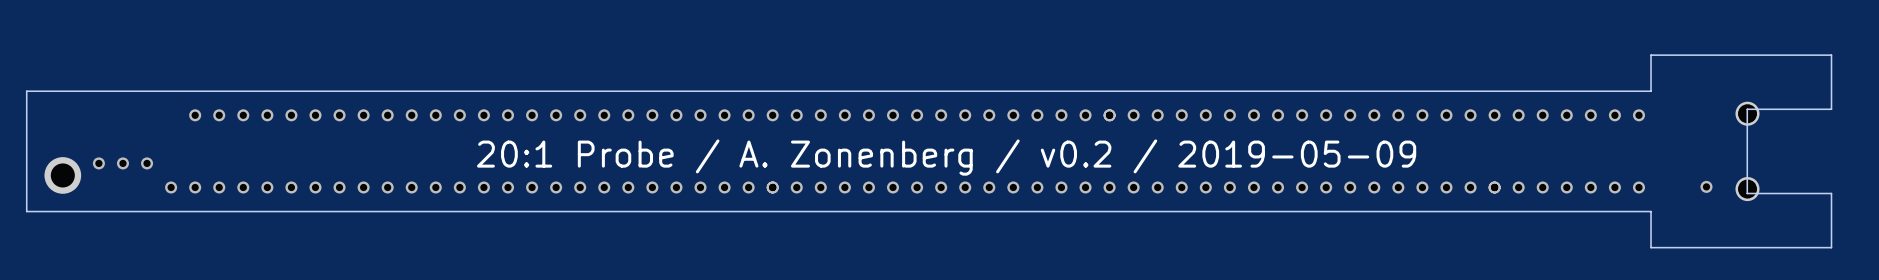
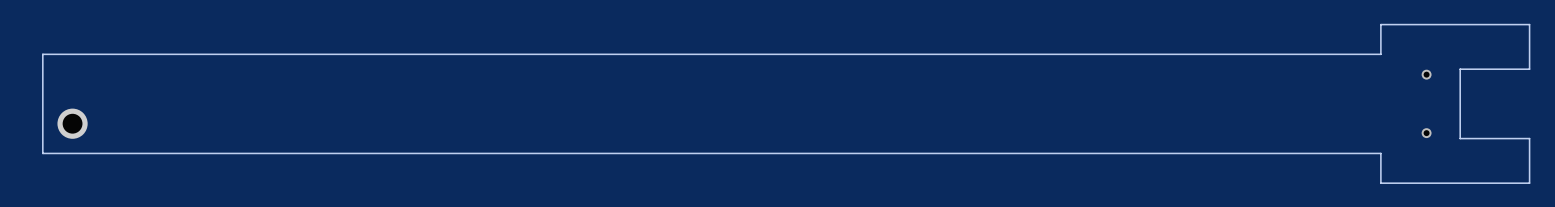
via: (195, 115) -> none
via: (219, 115) -> none
via: (243, 115) -> none
via: (267, 115) -> none
via: (291, 115) -> none
via: (315, 115) -> none
via: (339, 115) -> none
via: (363, 115) -> none
via: (387, 115) -> none
via: (411, 115) -> none
via: (435, 115) -> none
via: (459, 115) -> none
via: (483, 115) -> none
via: (507, 115) -> none
via: (532, 115) -> none
via: (556, 115) -> none
via: (580, 115) -> none
via: (604, 115) -> none
via: (628, 115) -> none
via: (652, 115) -> none
via: (676, 115) -> none
via: (700, 115) -> none
via: (724, 115) -> none
via: (748, 115) -> none
via: (772, 115) -> none
via: (796, 115) -> none
via: (820, 115) -> none
via: (844, 115) -> none
via: (868, 115) -> none
via: (893, 115) -> none
via: (917, 115) -> none
via: (941, 115) -> none
via: (965, 115) -> none
via: (989, 115) -> none
via: (1013, 115) -> none
via: (1037, 115) -> none
via: (1061, 115) -> none
via: (1085, 115) -> none
via: (1109, 115) -> none
via: (1133, 115) -> none
via: (1157, 115) -> none
via: (1181, 115) -> none
via: (1205, 115) -> none
via: (1229, 115) -> none
via: (1253, 115) -> none
via: (1278, 115) -> none
via: (1302, 115) -> none
via: (1326, 115) -> none
via: (1350, 115) -> none
via: (1374, 115) -> none
via: (1398, 115) -> none
via: (1422, 115) -> none
via: (1446, 115) -> none
via: (1470, 115) -> none
via: (1494, 115) -> none
via: (1518, 115) -> none
via: (1542, 115) -> none
via: (1566, 115) -> none
via: (1590, 115) -> none
via: (1614, 115) -> none
via: (1638, 115) -> none
via: none -> (1426, 74)
part: (1747, 151) -> none
text: 20:1 Probe / A. Zonenberg / v0.2 / 2019-05-09 (946, 157) -> none
via: (98, 163) -> none
via: (122, 163) -> none
via: (147, 163) -> none
via: (171, 187) -> none
via: (195, 187) -> none
via: (219, 187) -> none
via: (243, 187) -> none
via: (267, 187) -> none
via: (291, 187) -> none
via: (315, 187) -> none
via: (339, 187) -> none
via: (363, 187) -> none
via: (387, 187) -> none
via: (411, 187) -> none
via: (435, 187) -> none
via: (459, 187) -> none
via: (483, 187) -> none
via: (507, 187) -> none
via: (532, 187) -> none
via: (556, 187) -> none
via: (580, 187) -> none
via: (604, 187) -> none
via: (628, 187) -> none
via: (652, 187) -> none
via: (676, 187) -> none
via: (700, 187) -> none
via: (724, 187) -> none
via: (748, 187) -> none
via: (772, 187) -> none
via: (796, 187) -> none
via: (820, 187) -> none
via: (844, 187) -> none
via: (868, 187) -> none
via: (893, 187) -> none
via: (917, 187) -> none
via: (941, 187) -> none
via: (965, 187) -> none
via: (989, 187) -> none
via: (1013, 187) -> none
via: (1037, 187) -> none
via: (1061, 187) -> none
via: (1085, 187) -> none
via: (1109, 187) -> none
via: (1133, 187) -> none
via: (1157, 187) -> none
via: (1181, 187) -> none
via: (1205, 187) -> none
via: (1229, 187) -> none
via: (1253, 187) -> none
via: (1278, 187) -> none
via: (1302, 187) -> none
via: (1326, 187) -> none
via: (1350, 187) -> none
via: (1374, 187) -> none
via: (1398, 187) -> none
via: (1422, 187) -> none
via: (1446, 187) -> none
via: (1470, 187) -> none
via: (1494, 187) -> none
via: (1518, 187) -> none
via: (1542, 187) -> none
via: (1566, 187) -> none
via: (1590, 187) -> none
via: (1614, 187) -> none
via: (1638, 187) -> none

